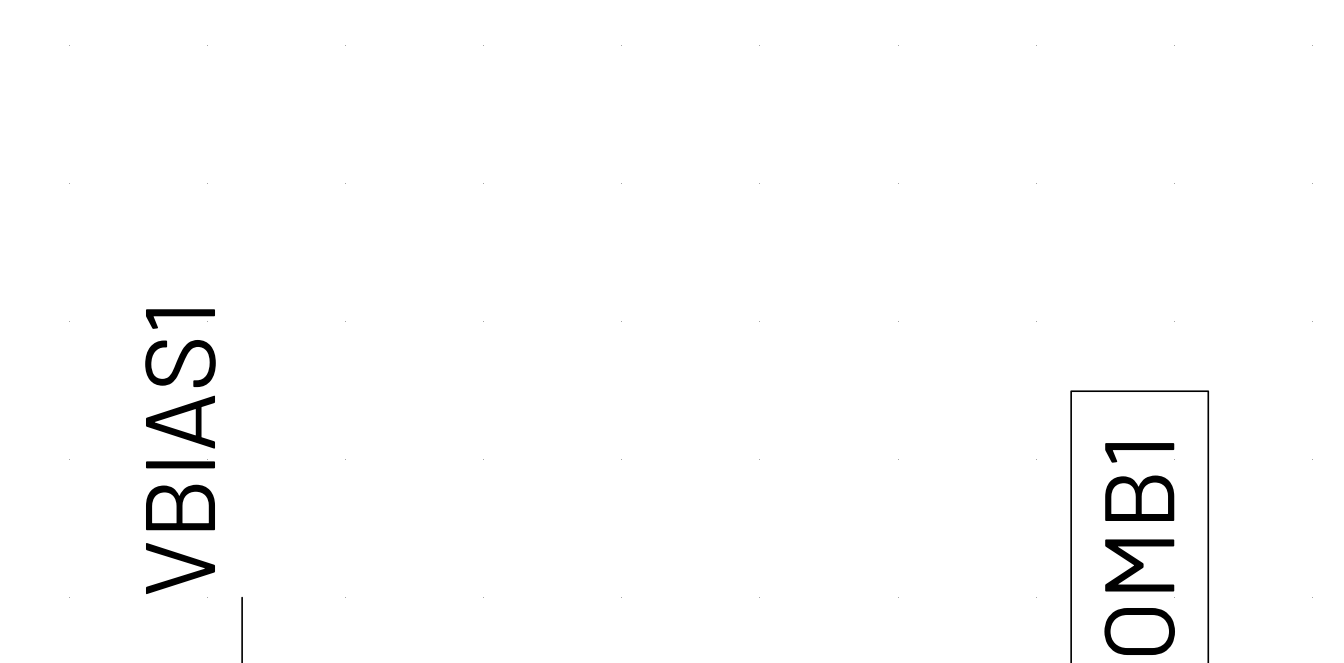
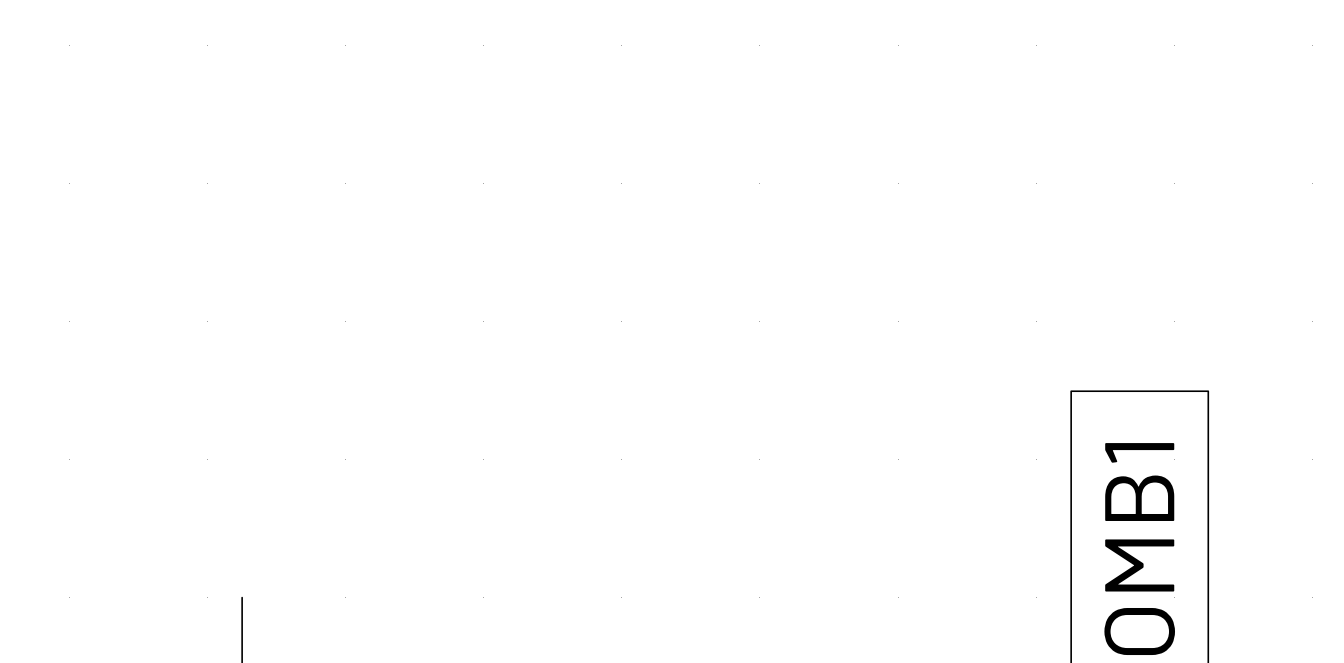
label: VBIAS1 (180, 451) -> none

